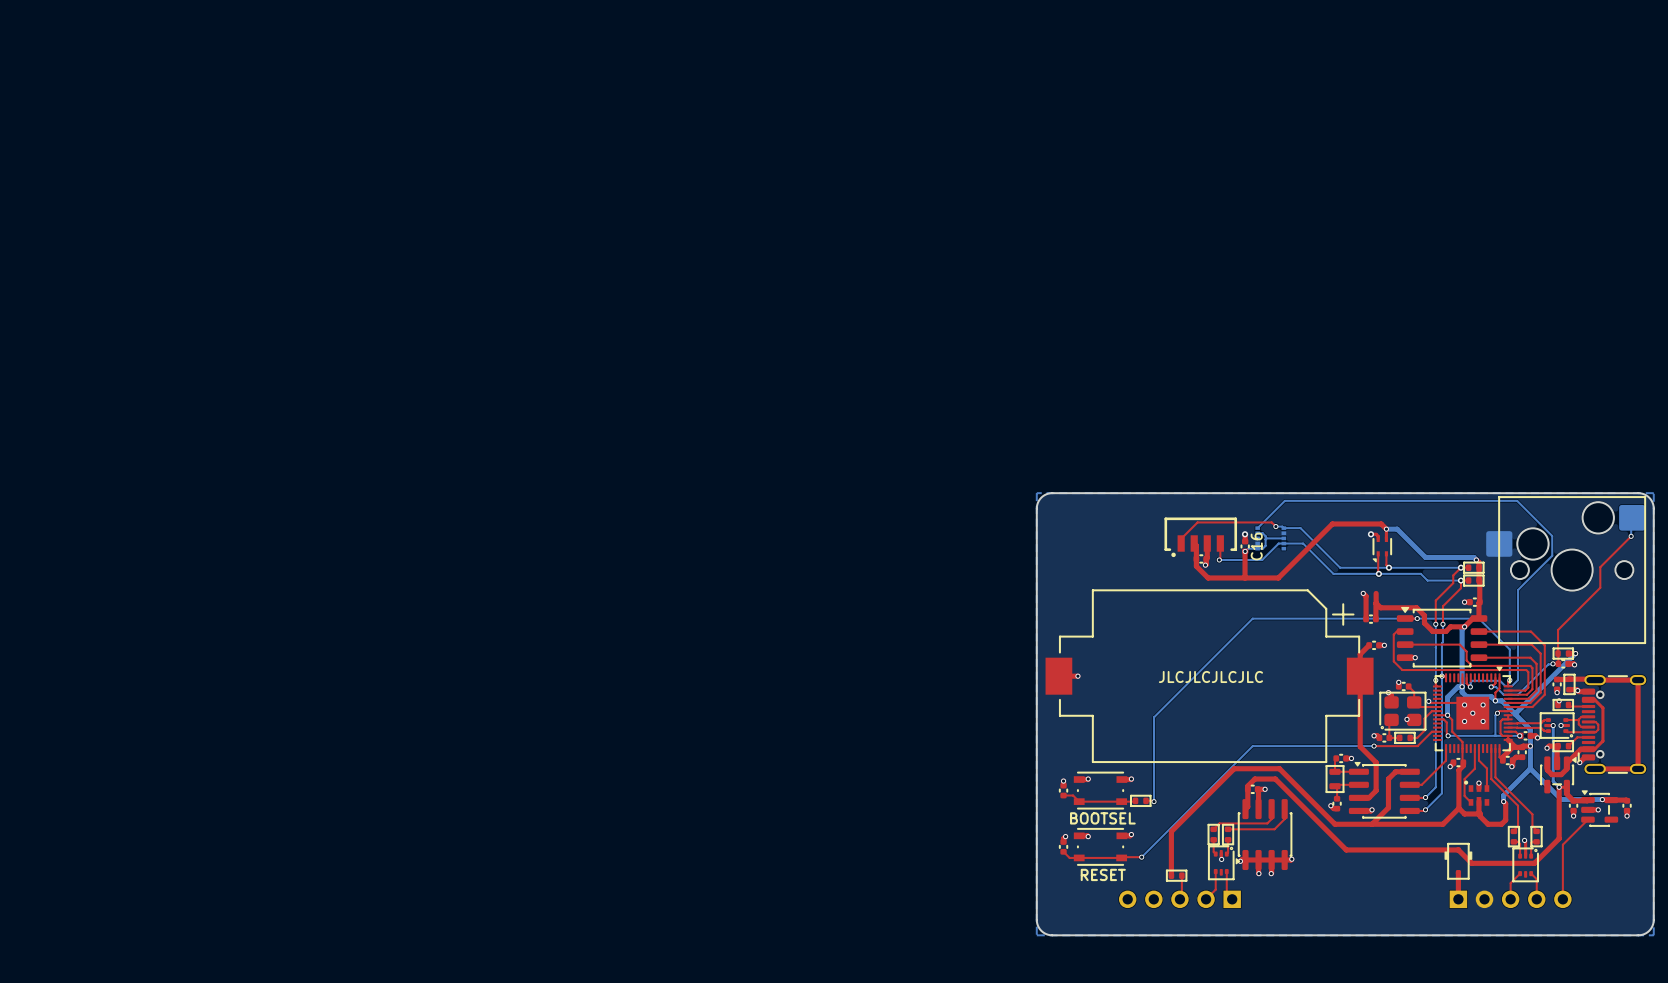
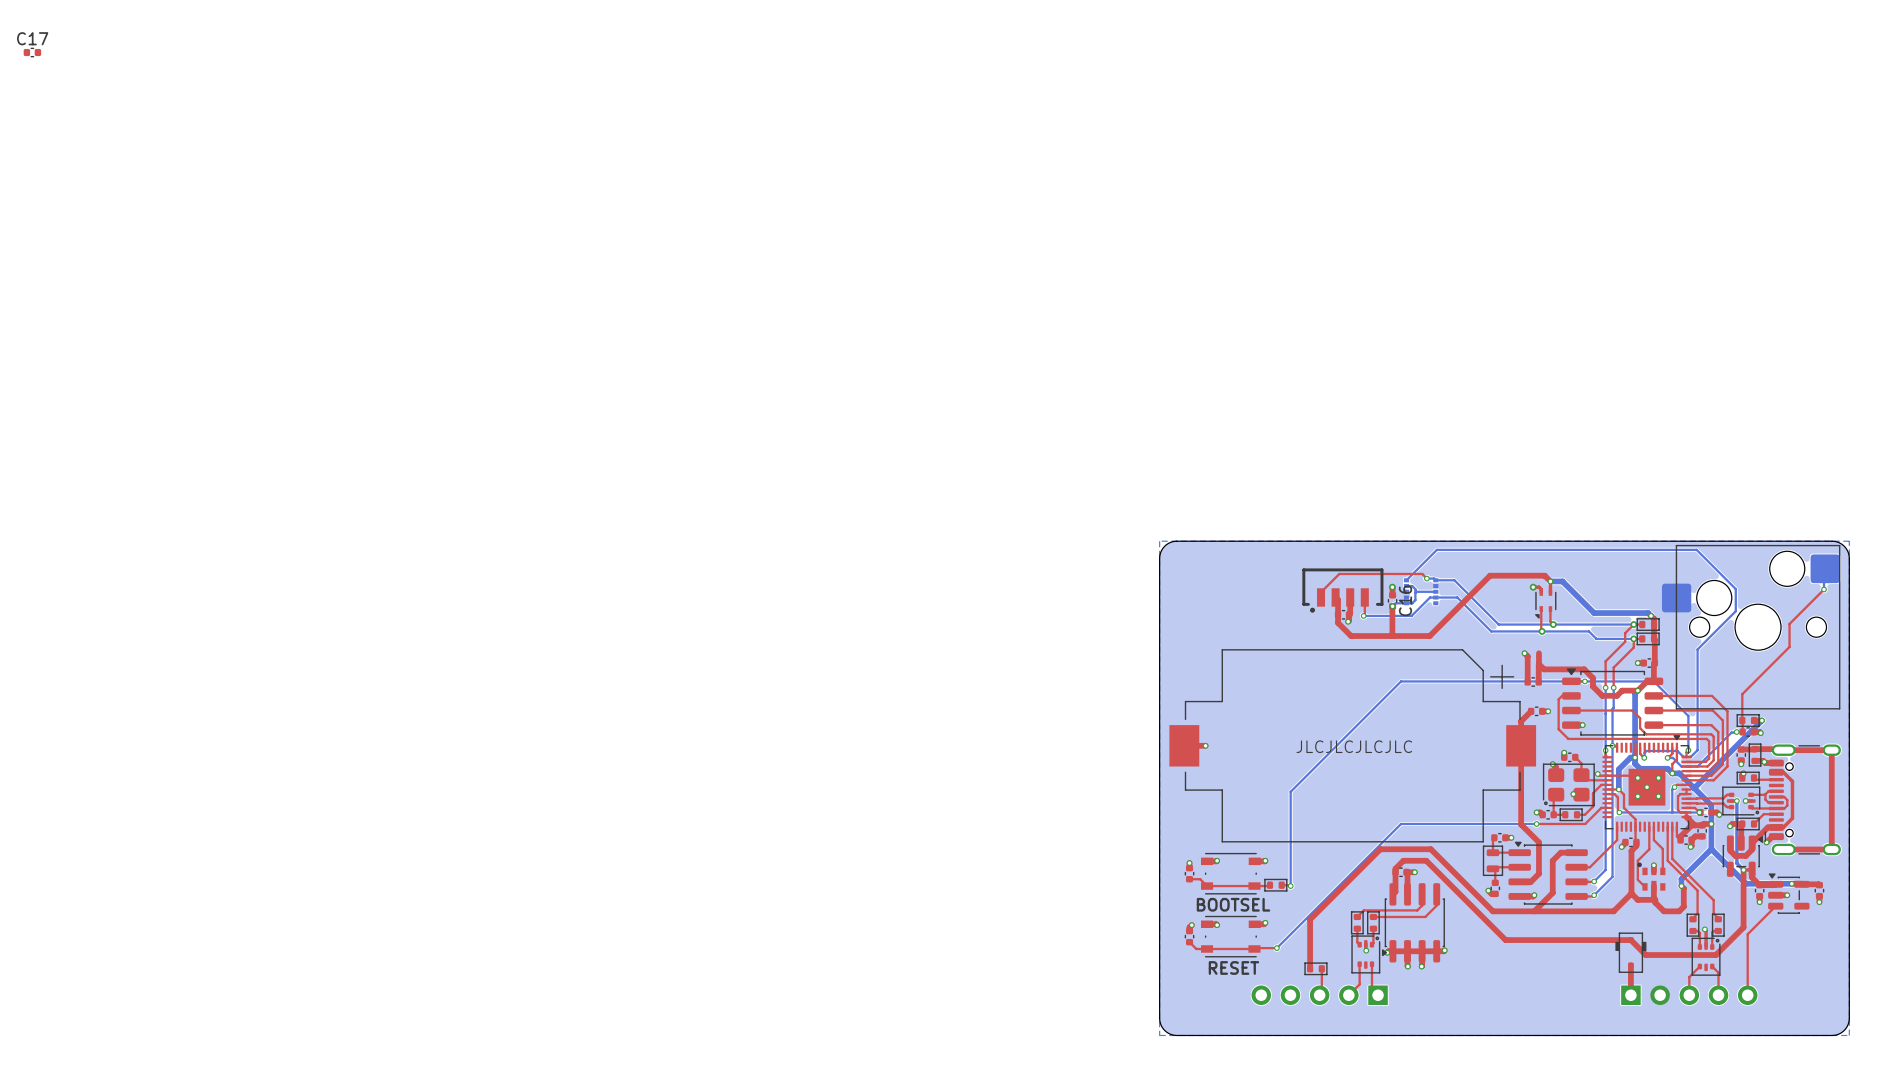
C17: none -> (32, 52)

